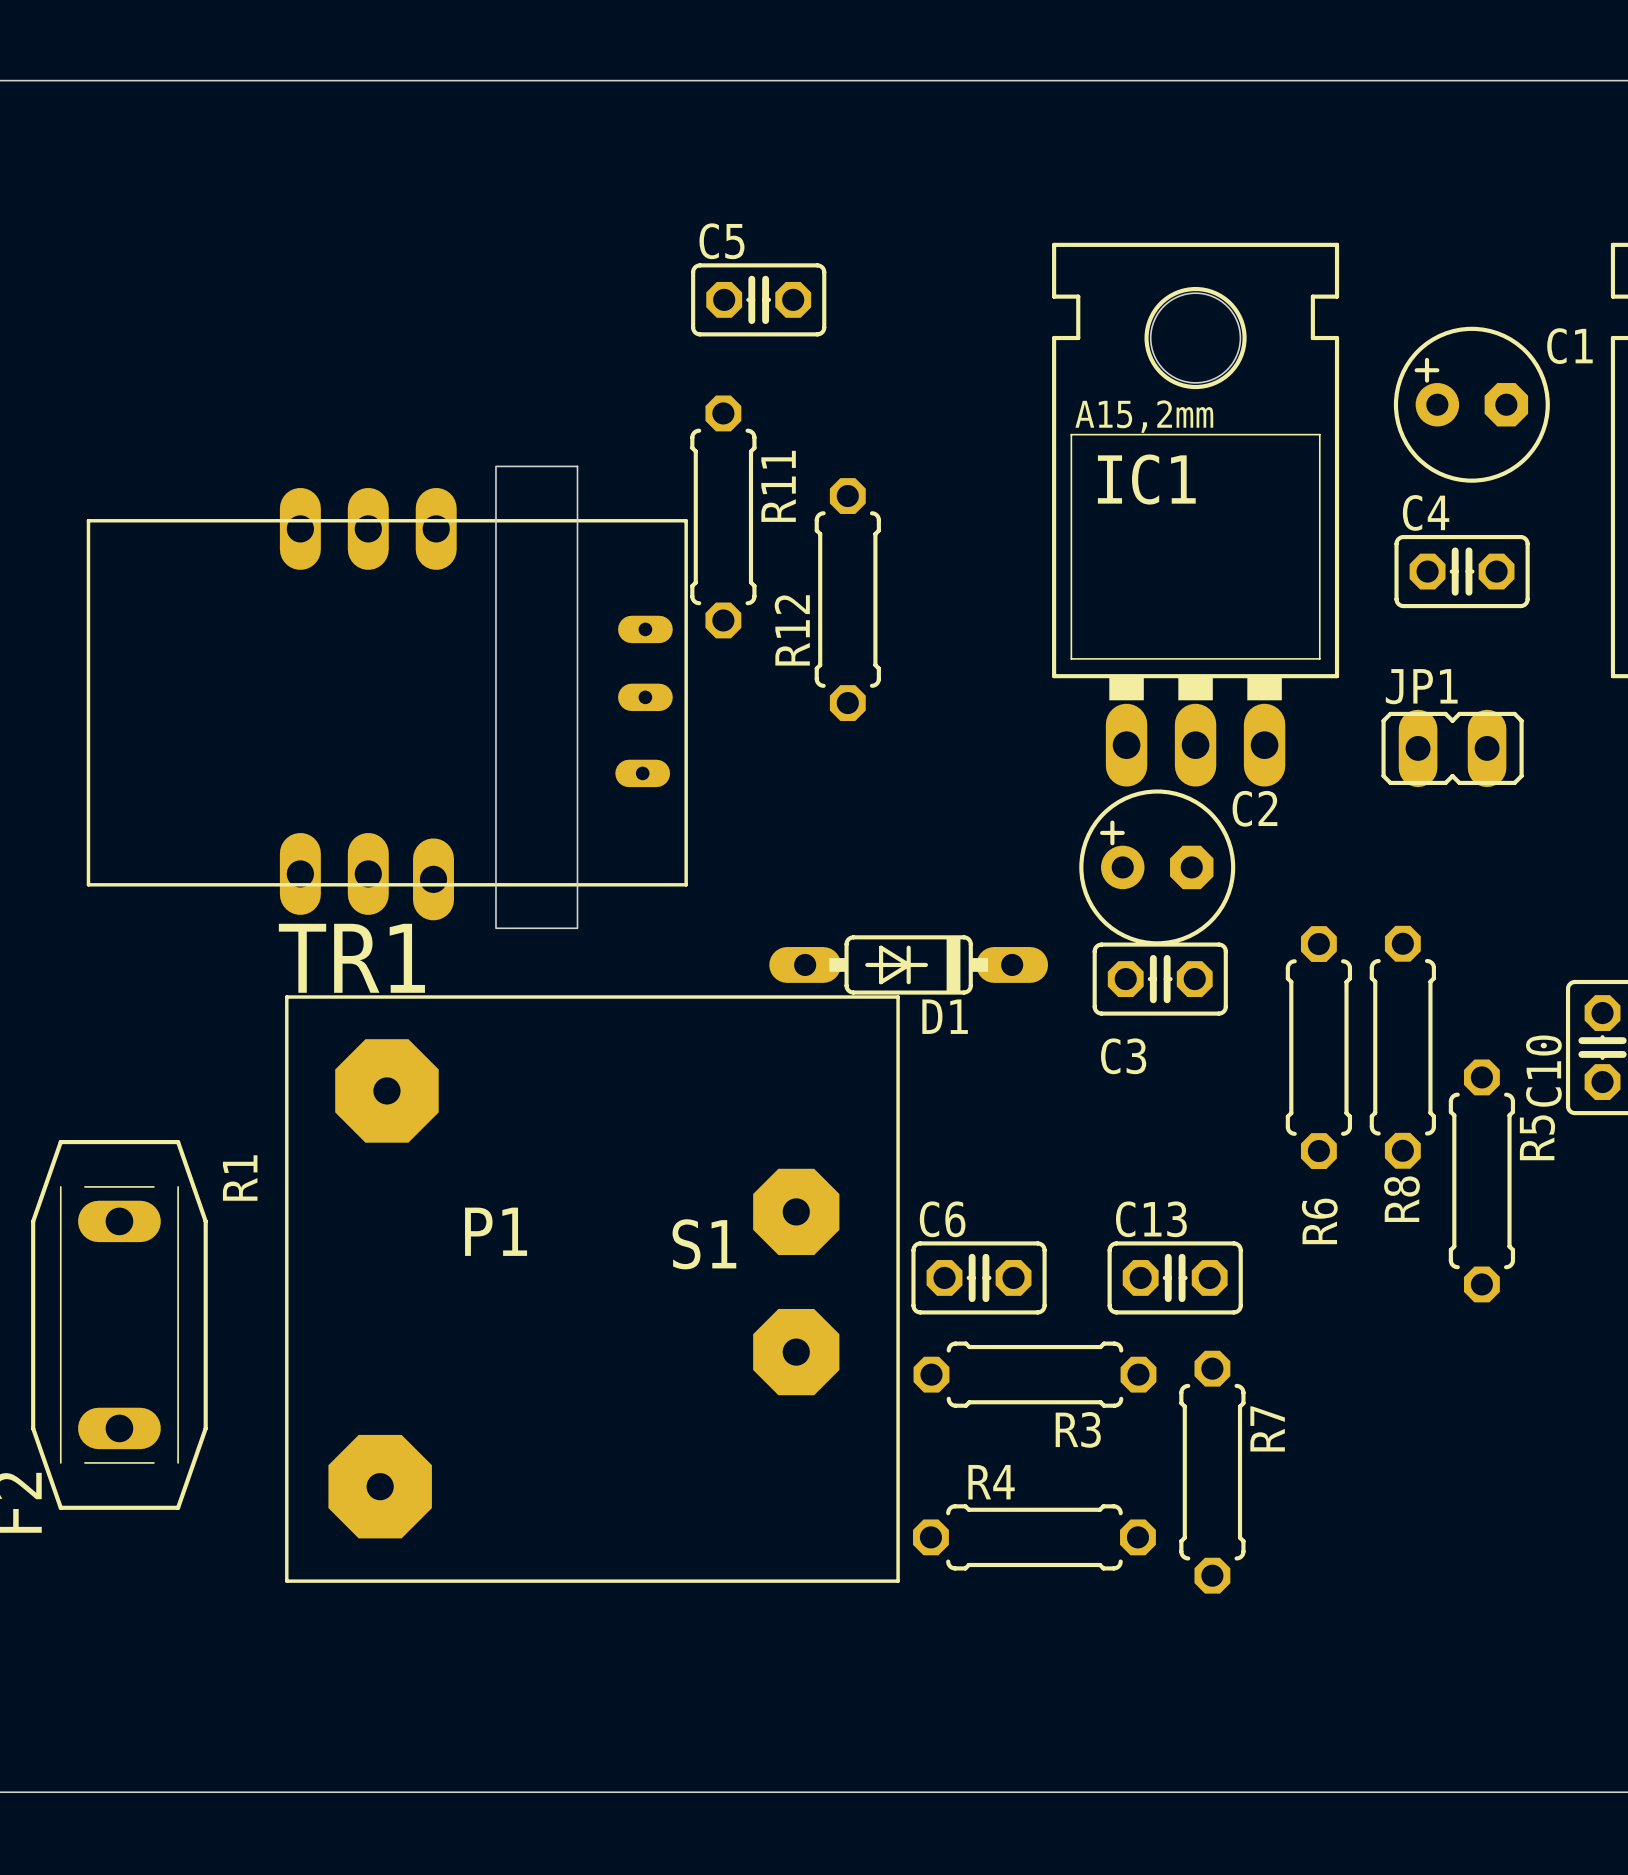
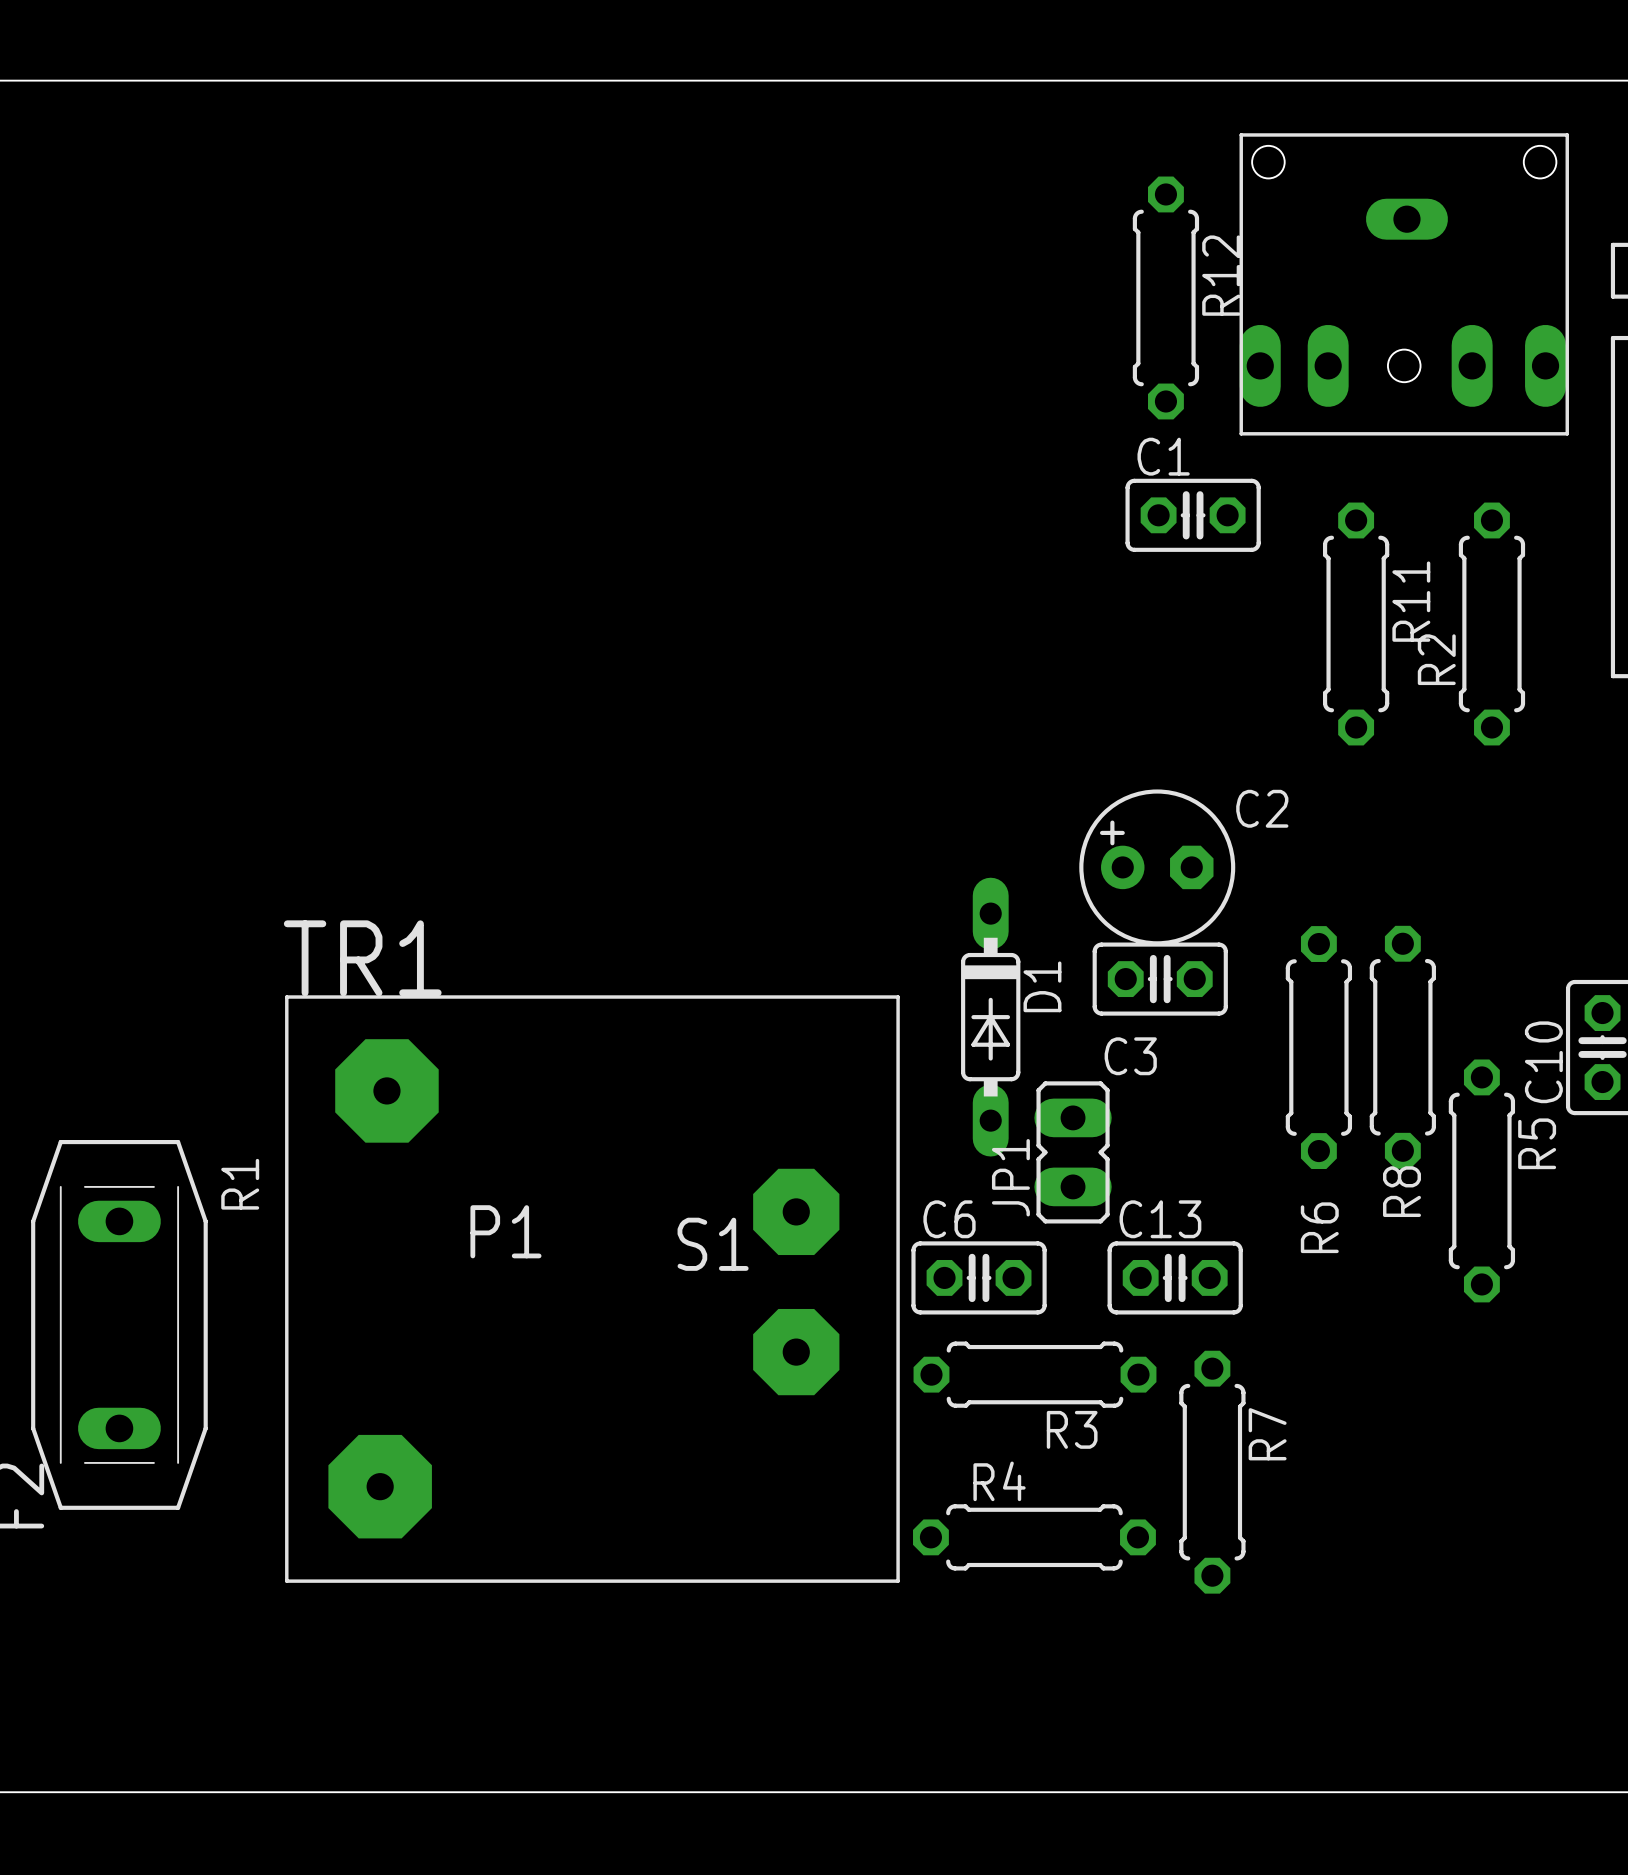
part: none -> (1404, 284)
C5: (758, 299) -> none
C1 footprint: [1393, 326, 1550, 483] -> [1125, 478, 1261, 552]
C1 name position: C1 (1569, 346) -> C1 (1163, 456)
IC1: (1195, 514) -> none
R11 position: (723, 516) -> (1356, 623)
C4: (1462, 571) -> none
R12 position: (847, 599) -> (1165, 297)
R2: none -> (1491, 623)
R12 name position: R12 (792, 630) -> R12 (1221, 275)
JP1 name position: JP1 (1421, 686) -> JP1 (1010, 1177)
part: (387, 697) -> none
JP1 rotation: 0° (1452, 748) -> 90° clockwise (1073, 1152)
JP1 position: (1452, 748) -> (1073, 1152)
D1 rotation: 0° (908, 964) -> 90° counterclockwise (990, 1017)

